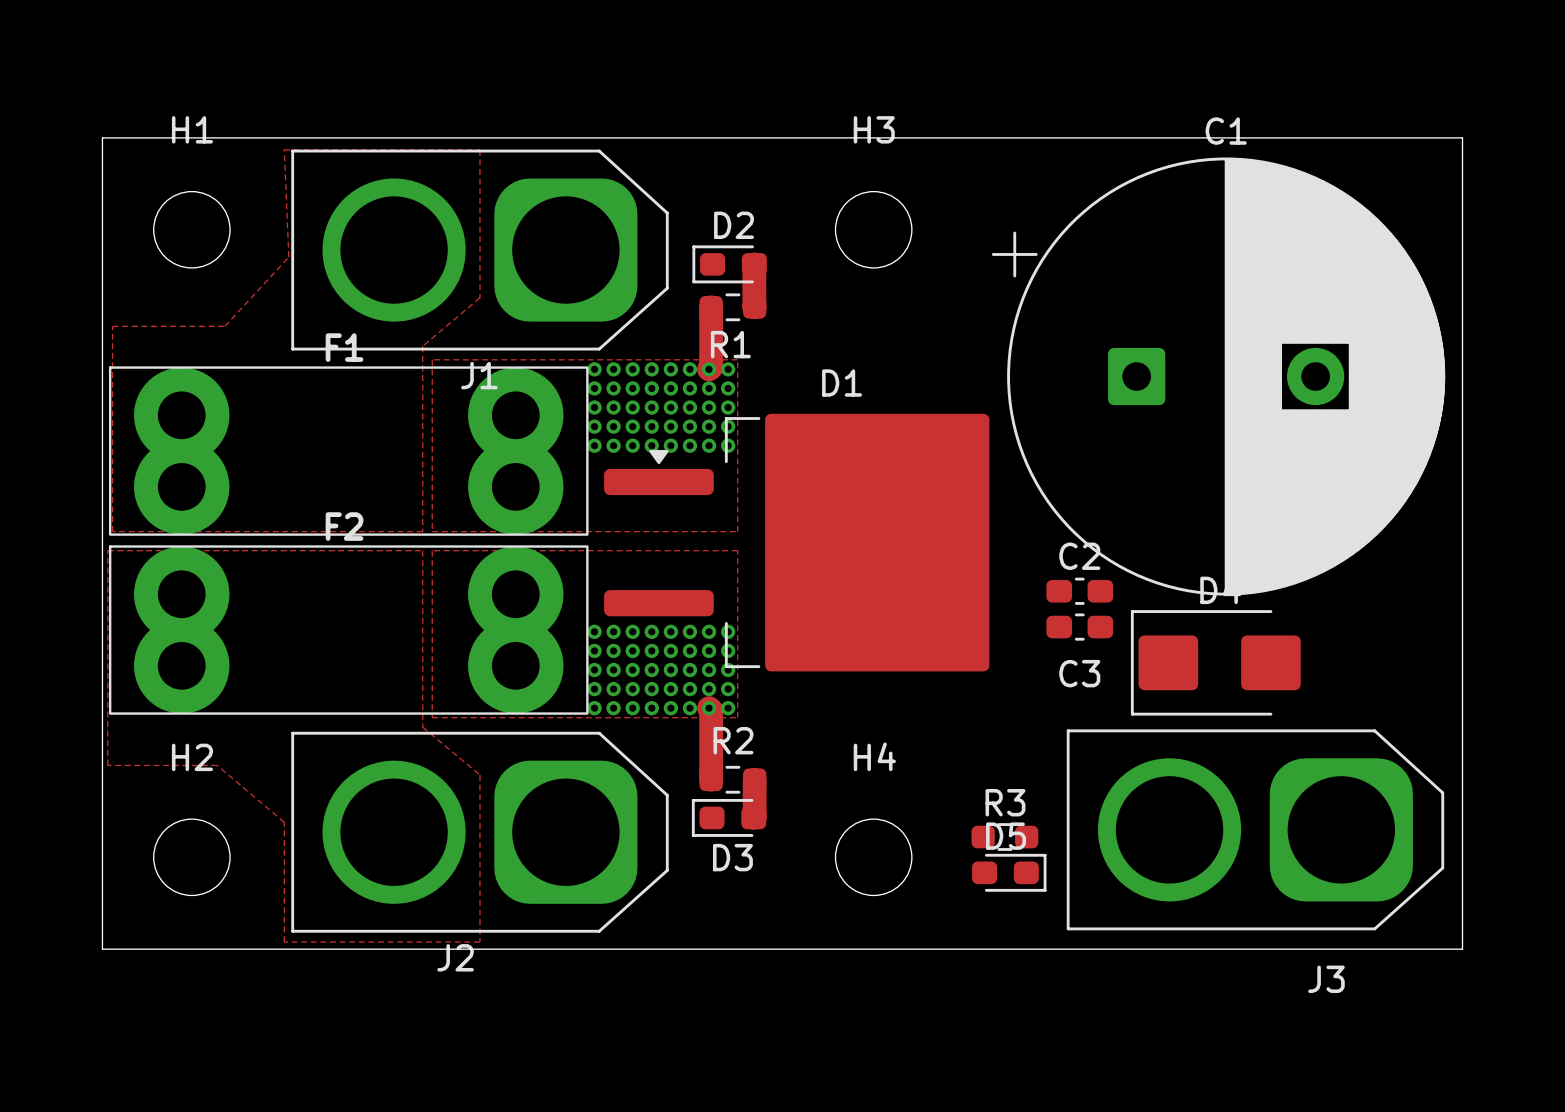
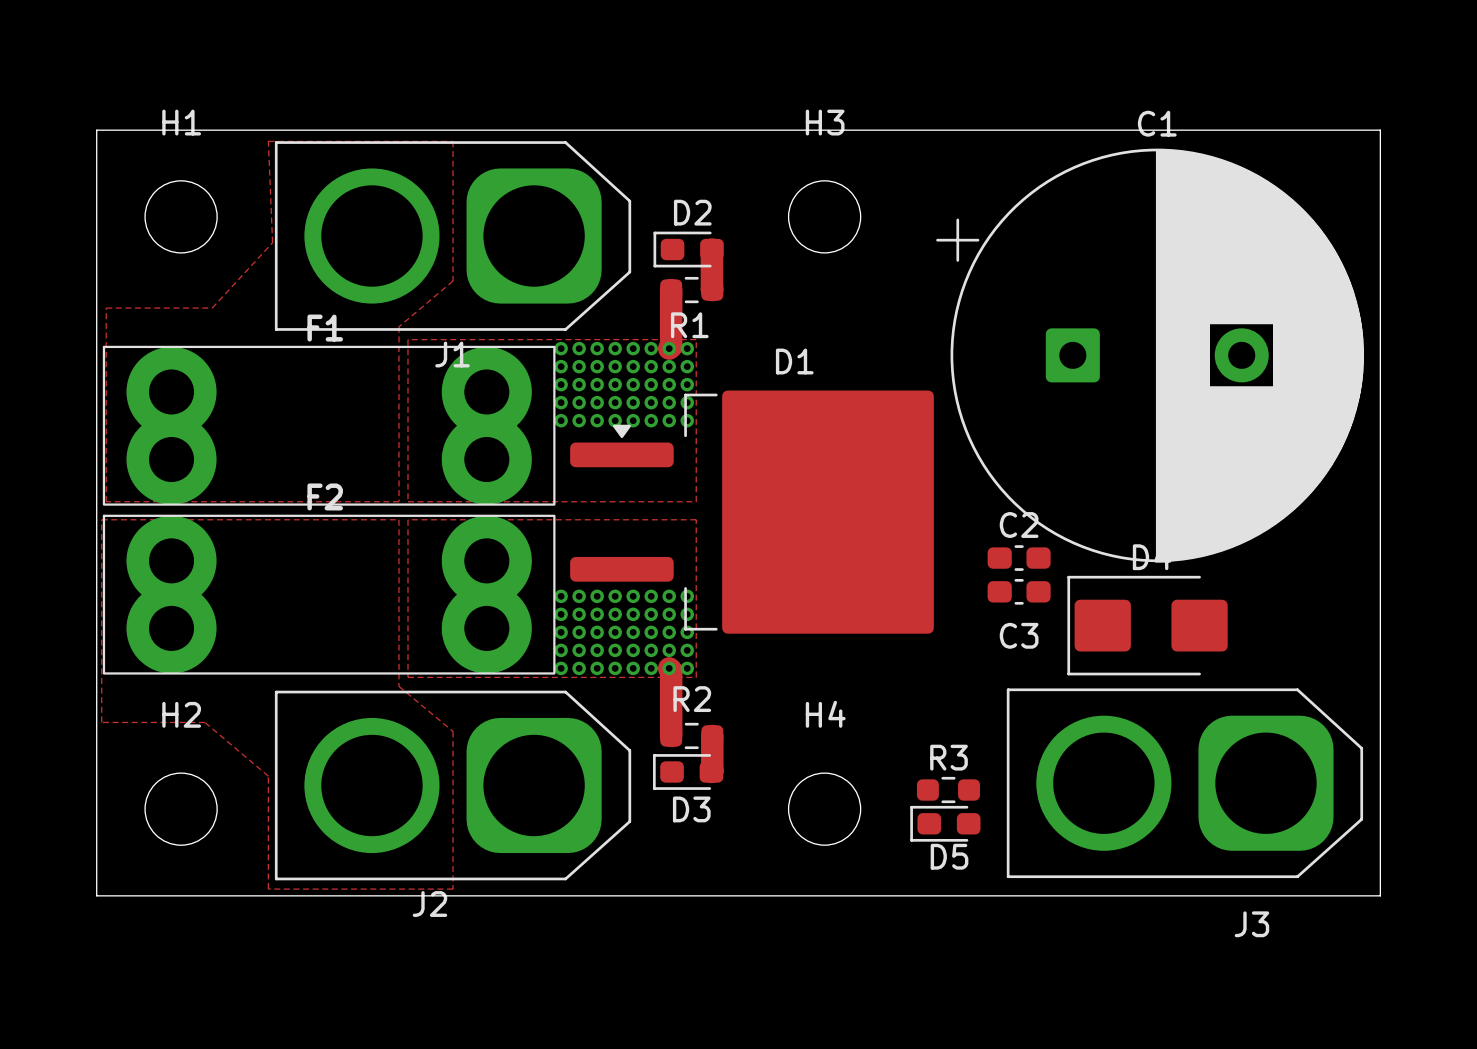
D5 rotation: 0° (1009, 872) -> 180° (945, 823)

